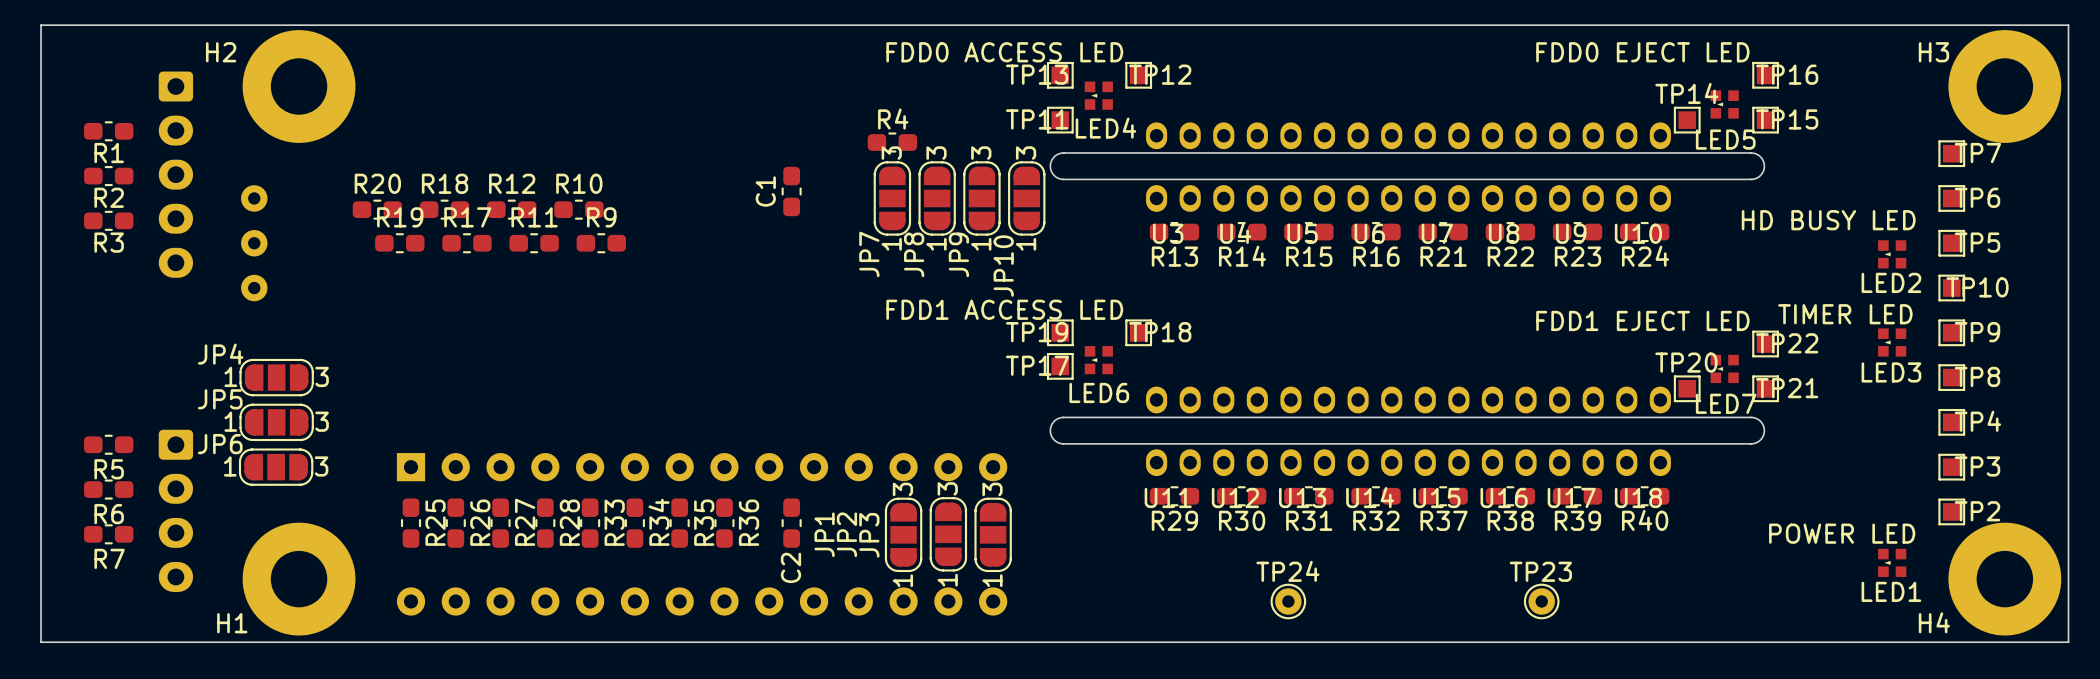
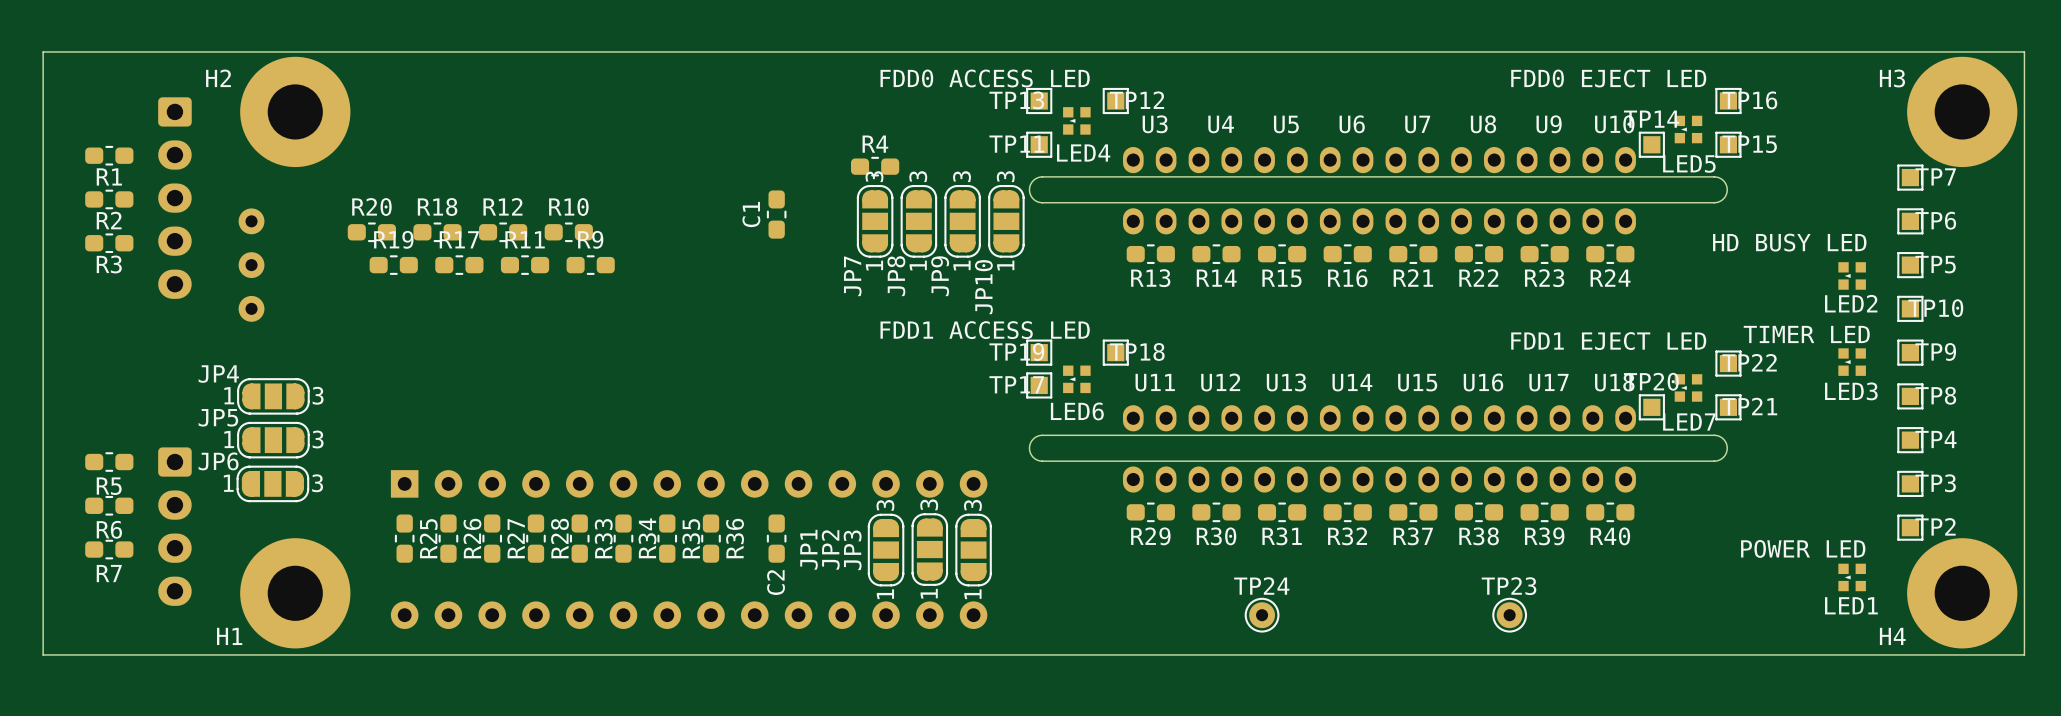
U3 name position: U3 (1168, 233) -> U3 (1155, 124)
U4 name position: U4 (1235, 233) -> U4 (1221, 124)
U5 name position: U5 (1302, 233) -> U5 (1286, 124)
U6 name position: U6 (1369, 233) -> U6 (1352, 124)
U7 name position: U7 (1437, 233) -> U7 (1417, 124)
U8 name position: U8 (1504, 233) -> U8 (1483, 124)
U9 name position: U9 (1571, 233) -> U9 (1549, 124)
U10 name position: U10 (1638, 233) -> U10 (1614, 124)
U11 name position: U11 (1168, 497) -> U11 (1155, 382)
U12 name position: U12 (1235, 497) -> U12 (1220, 382)
U13 name position: U13 (1302, 497) -> U13 (1286, 382)
U14 name position: U14 (1370, 497) -> U14 (1352, 382)
U15 name position: U15 (1436, 497) -> U15 (1417, 382)
U16 name position: U16 (1504, 497) -> U16 (1483, 382)
U17 name position: U17 (1571, 497) -> U17 (1548, 382)
U18 name position: U18 (1638, 497) -> U18 (1614, 382)

